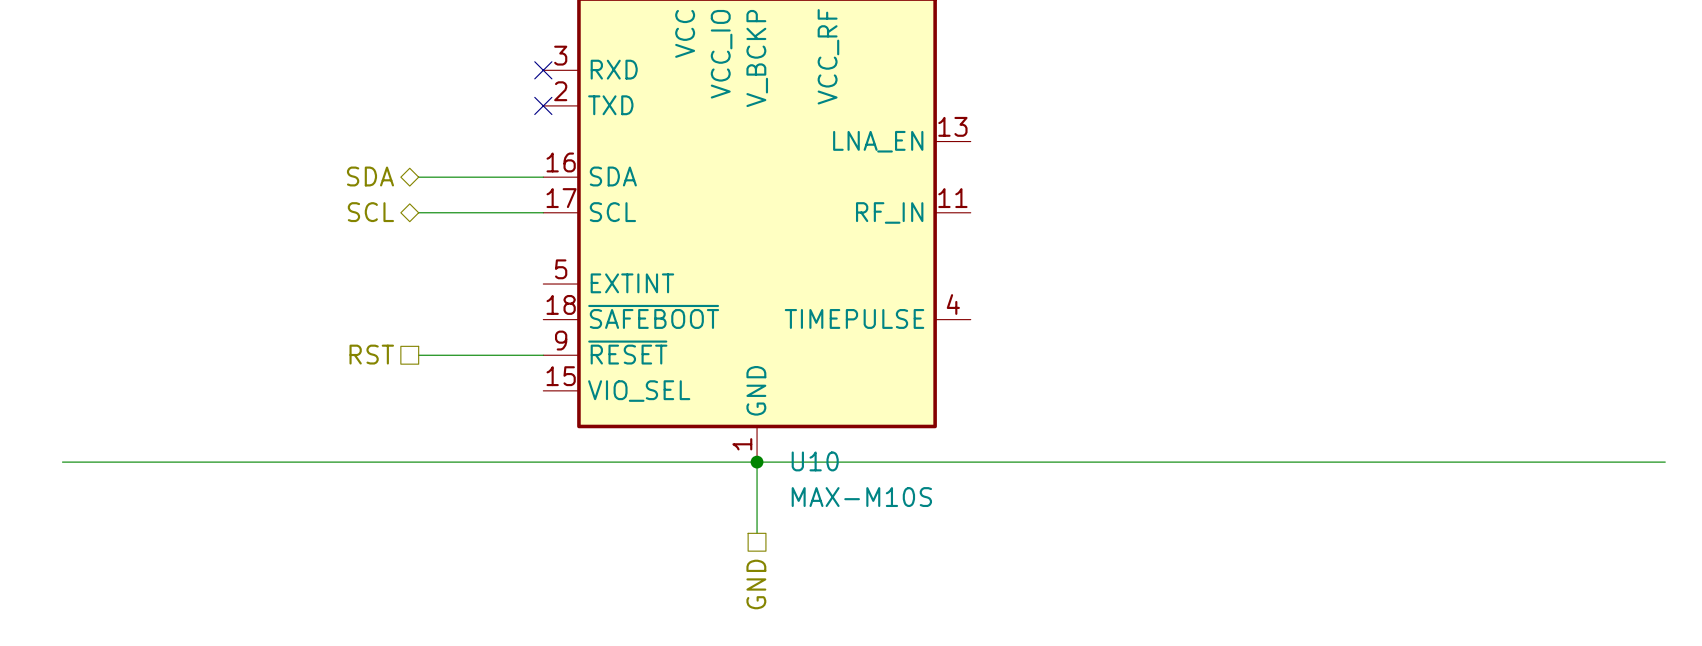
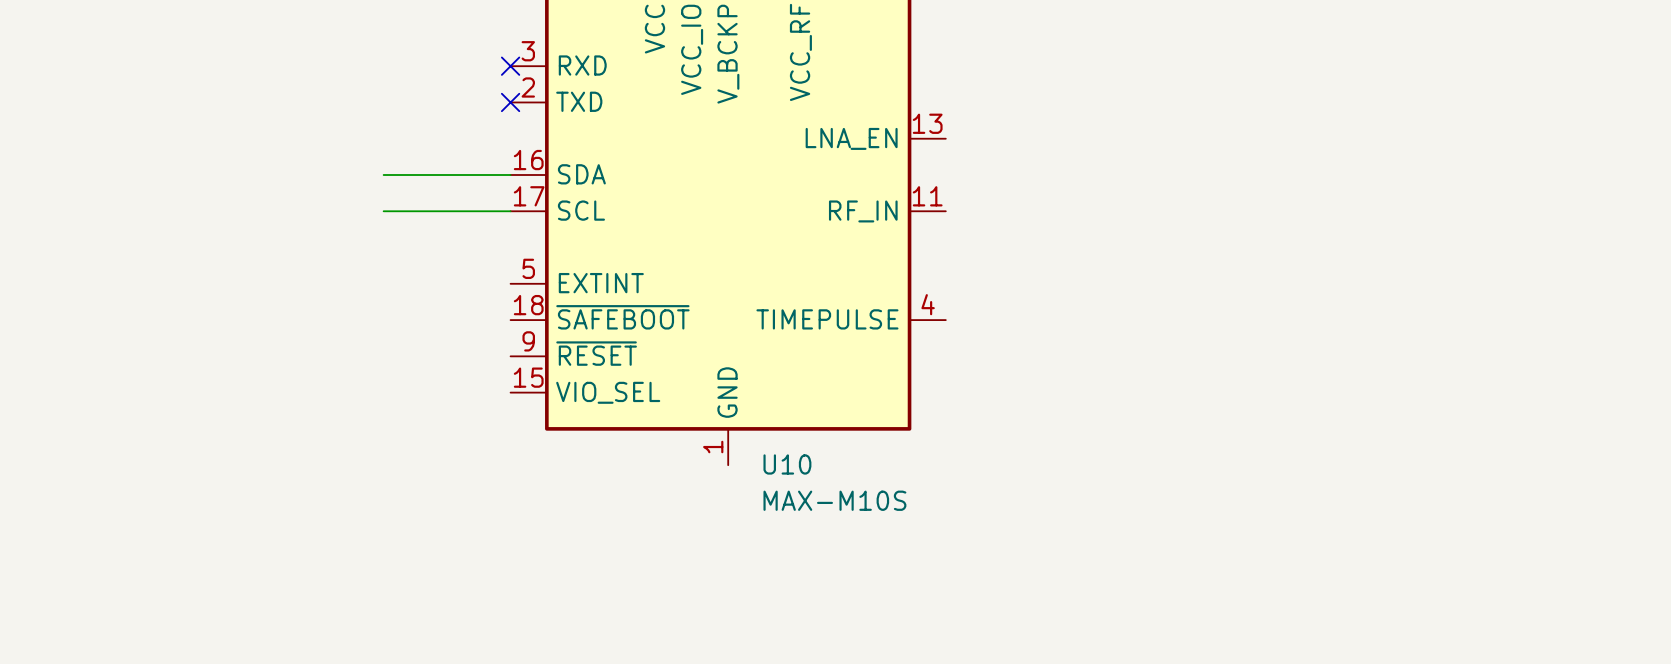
hierarchical label: SDA (370, 176) -> none
hierarchical label: SCL (370, 212) -> none
hierarchical label: RST (371, 354) -> none
wire: (418, 355) (543, 355) -> none
wire: (62, 462) (1665, 462) -> none
wire: (757, 462) (757, 533) -> none
junction: (757, 462) -> none
hierarchical label: GND (756, 584) -> none

